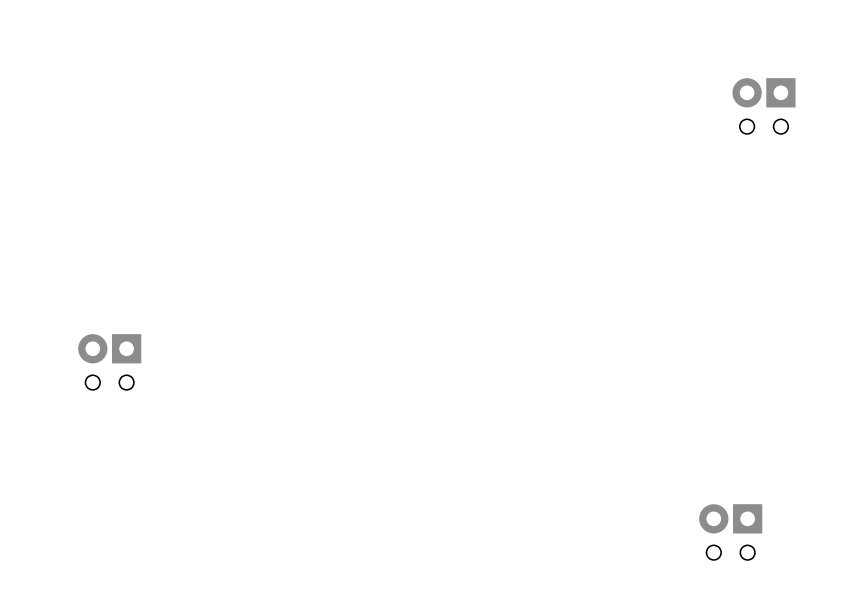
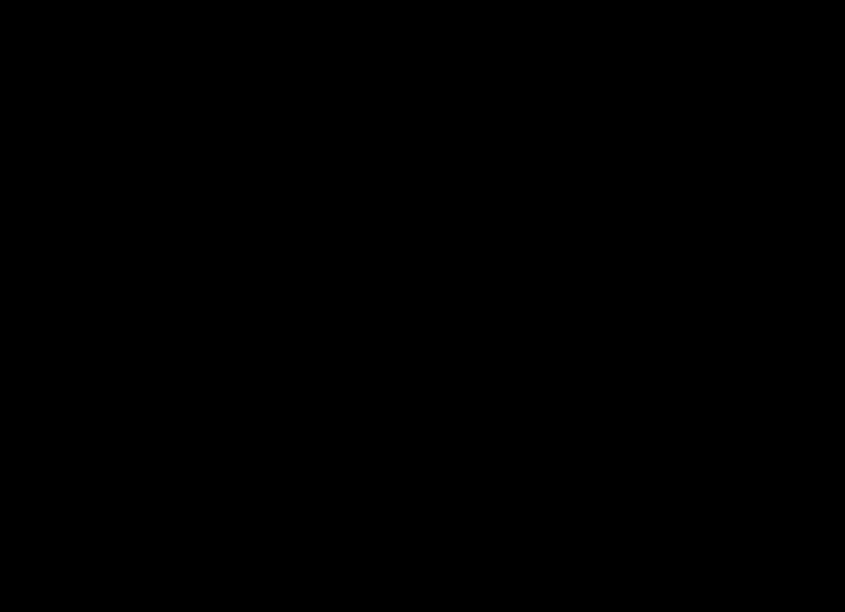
part: (764, 106) -> none
part: (109, 362) -> none
part: (730, 532) -> none

